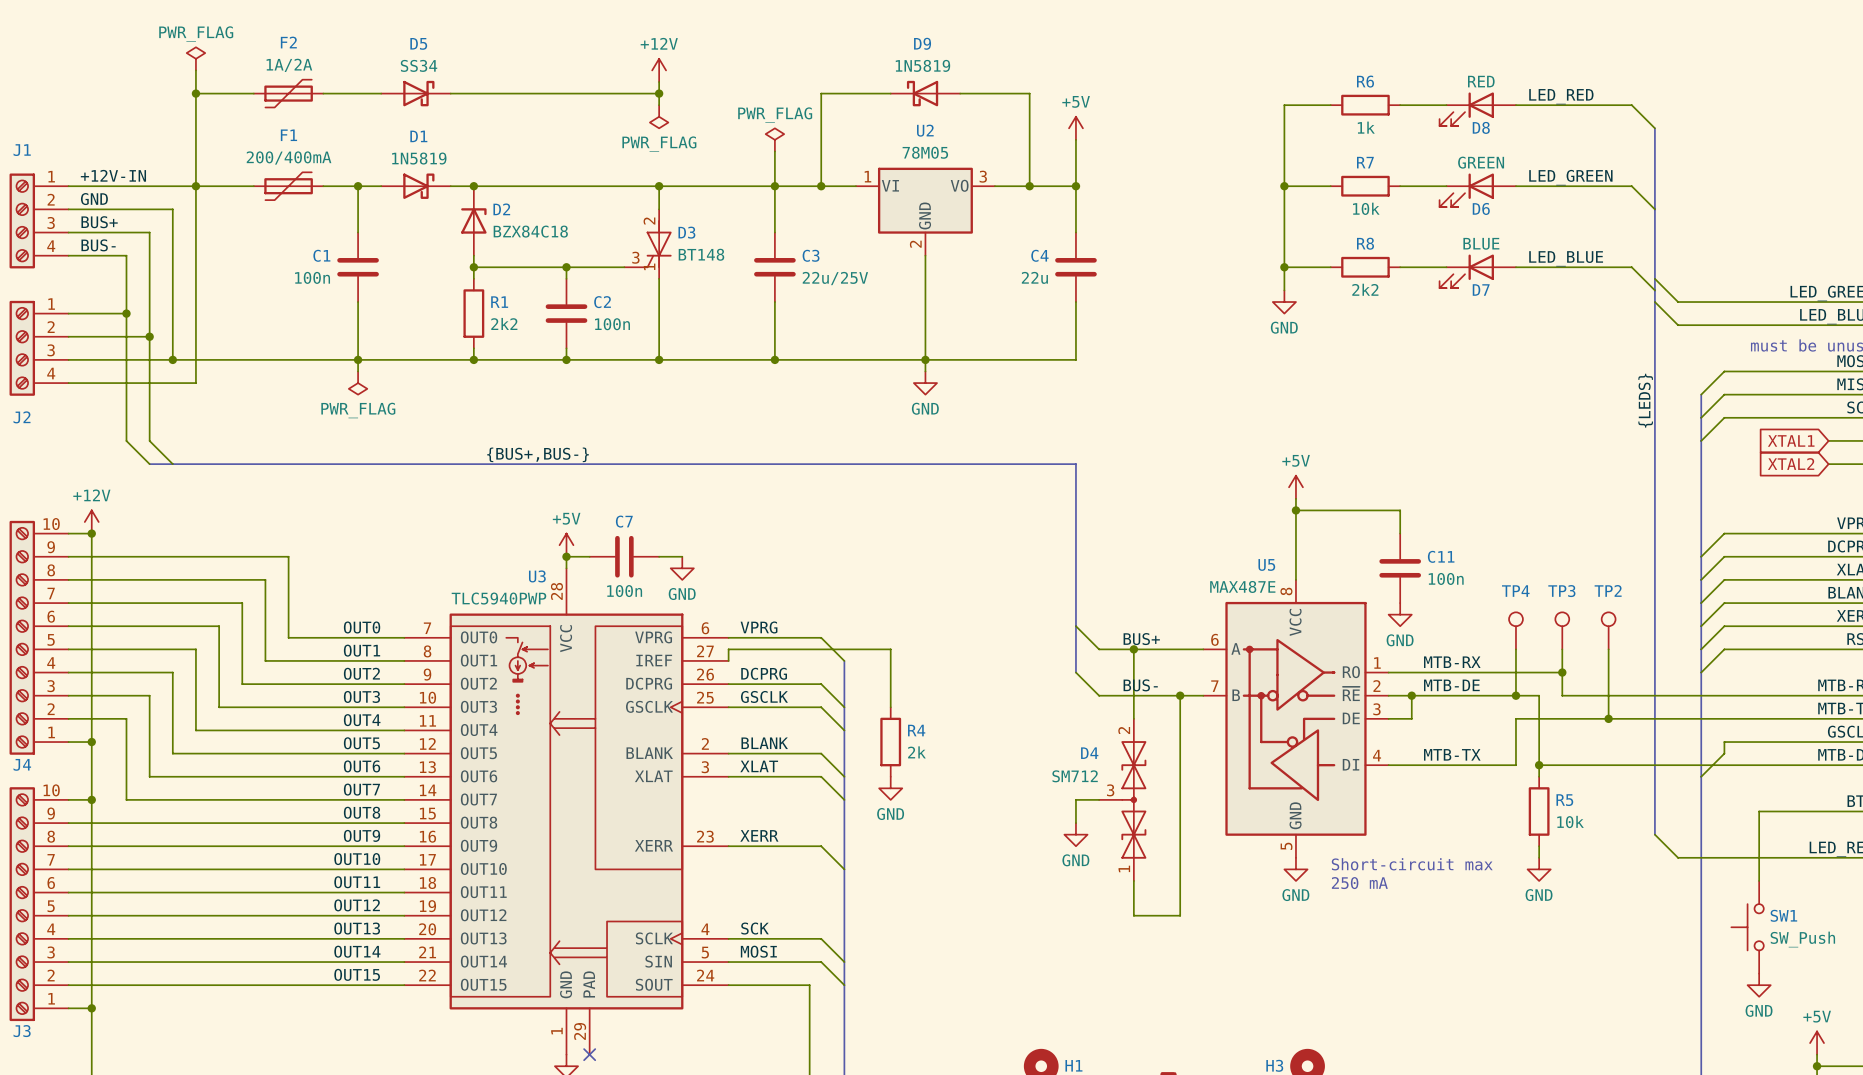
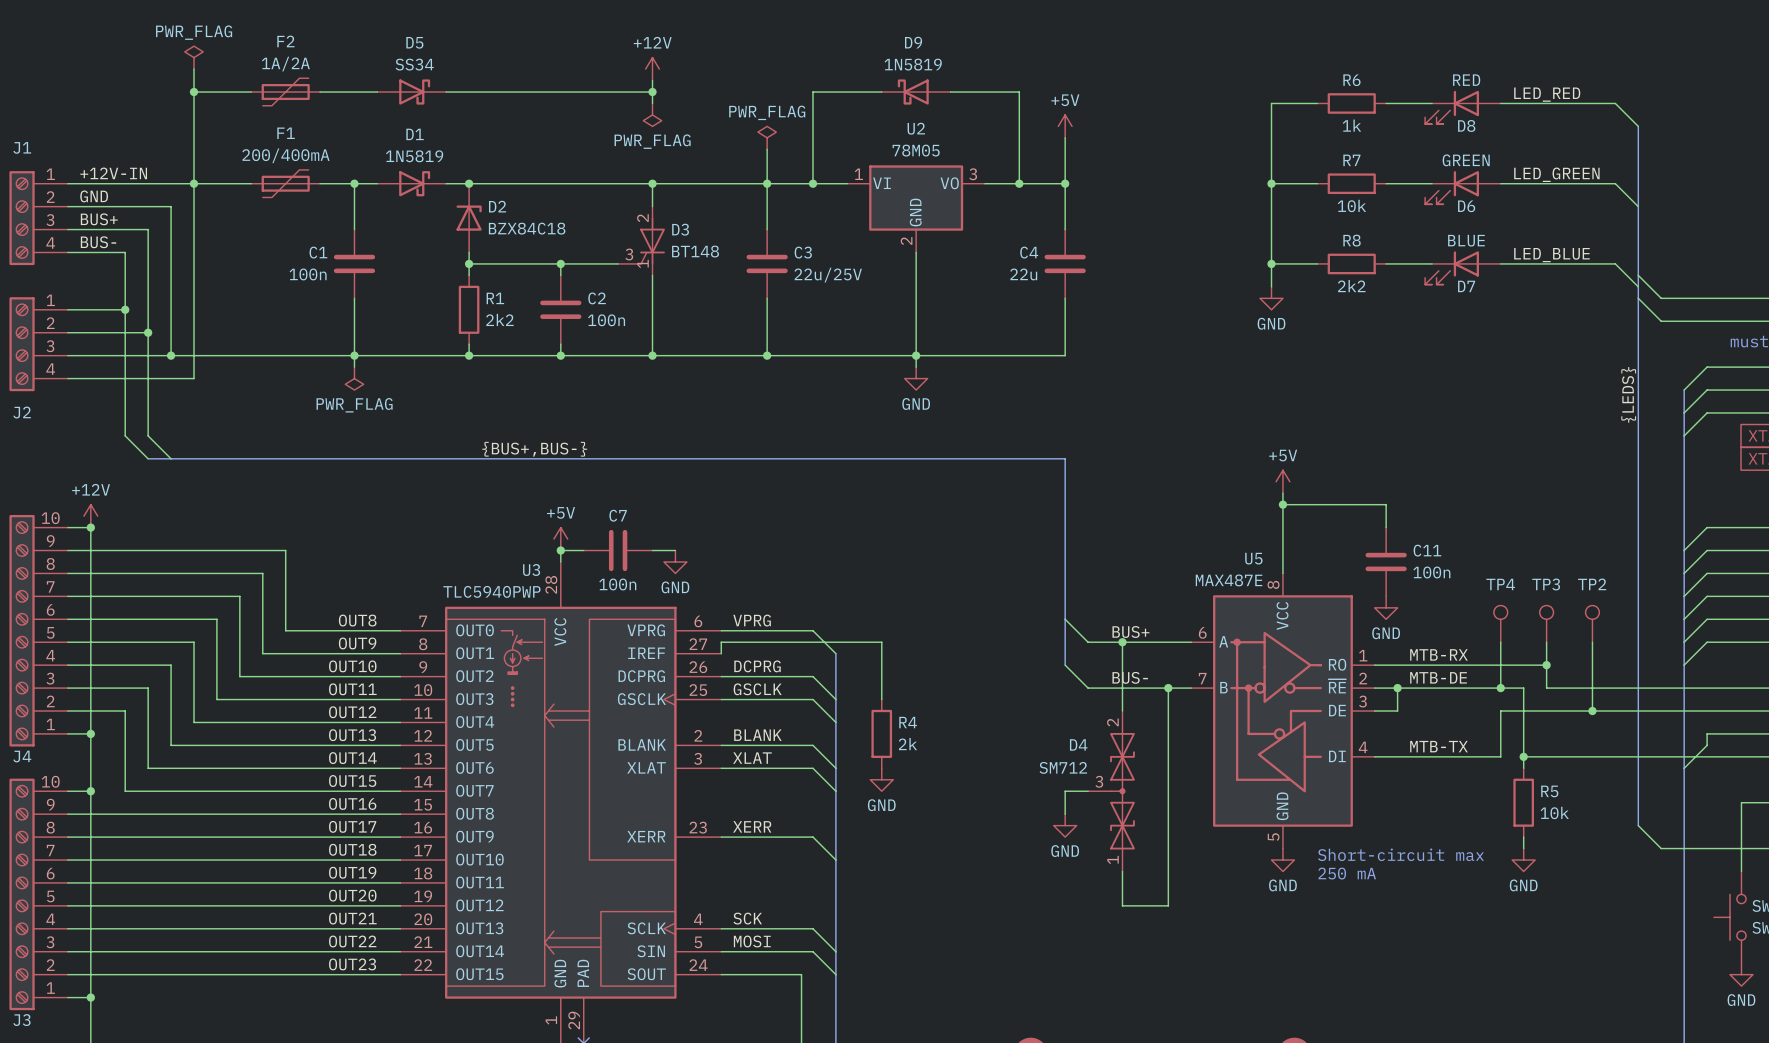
label: OUT0 (362, 627) -> OUT8 (357, 620)
label: OUT1 (362, 650) -> OUT9 (357, 643)
label: OUT2 (361, 673) -> OUT10 (352, 666)
label: OUT3 (361, 696) -> OUT11 (352, 689)
label: OUT4 (362, 720) -> OUT12 (352, 712)
label: OUT5 (361, 743) -> OUT13 (352, 735)
label: OUT6 (362, 766) -> OUT14 (352, 758)
label: OUT7 (361, 789) -> OUT15 (352, 781)
label: OUT8 (362, 812) -> OUT16 (352, 803)
label: OUT9 (362, 835) -> OUT17 (352, 826)
label: OUT10 (357, 859) -> OUT18 (352, 849)
label: OUT11 (357, 882) -> OUT19 (352, 872)
label: OUT12 (357, 905) -> OUT20 (352, 895)
label: OUT13 (357, 928) -> OUT21 (352, 918)
label: OUT14 (357, 951) -> OUT22 (352, 941)
label: OUT15 (357, 974) -> OUT23 (352, 964)

